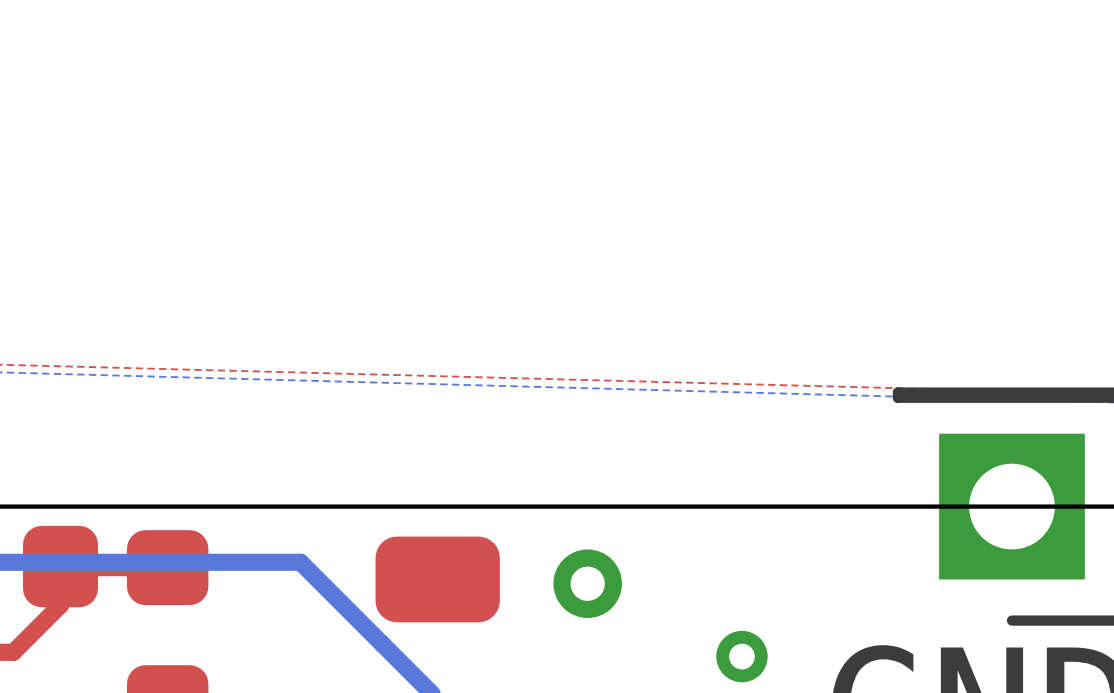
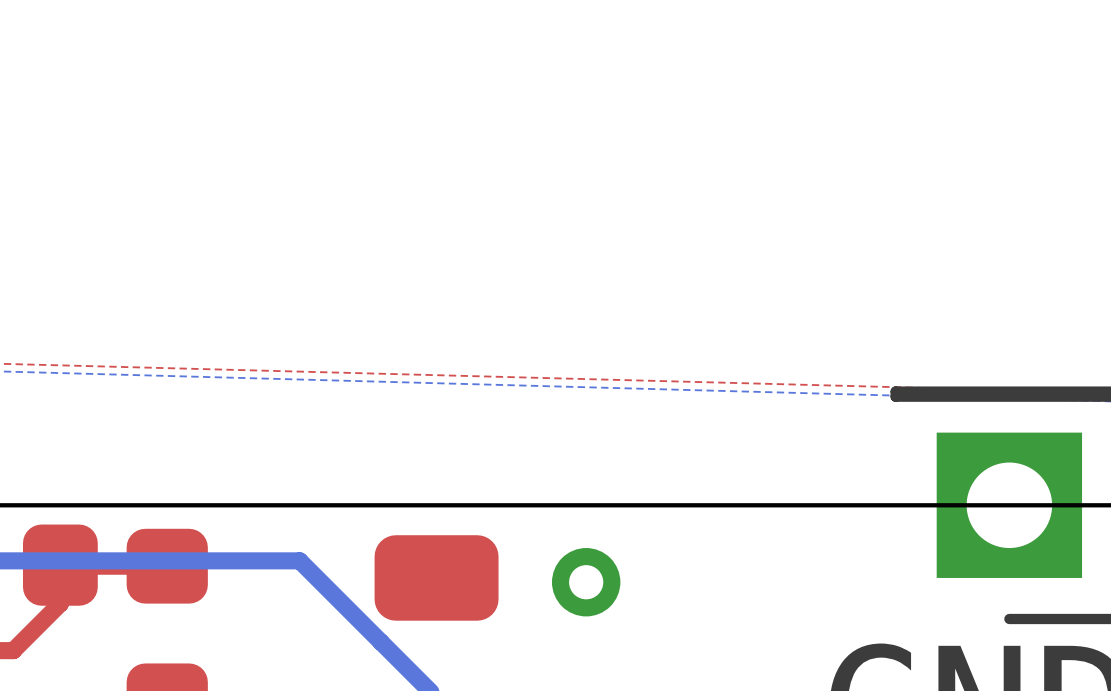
via: (741, 656) -> none

